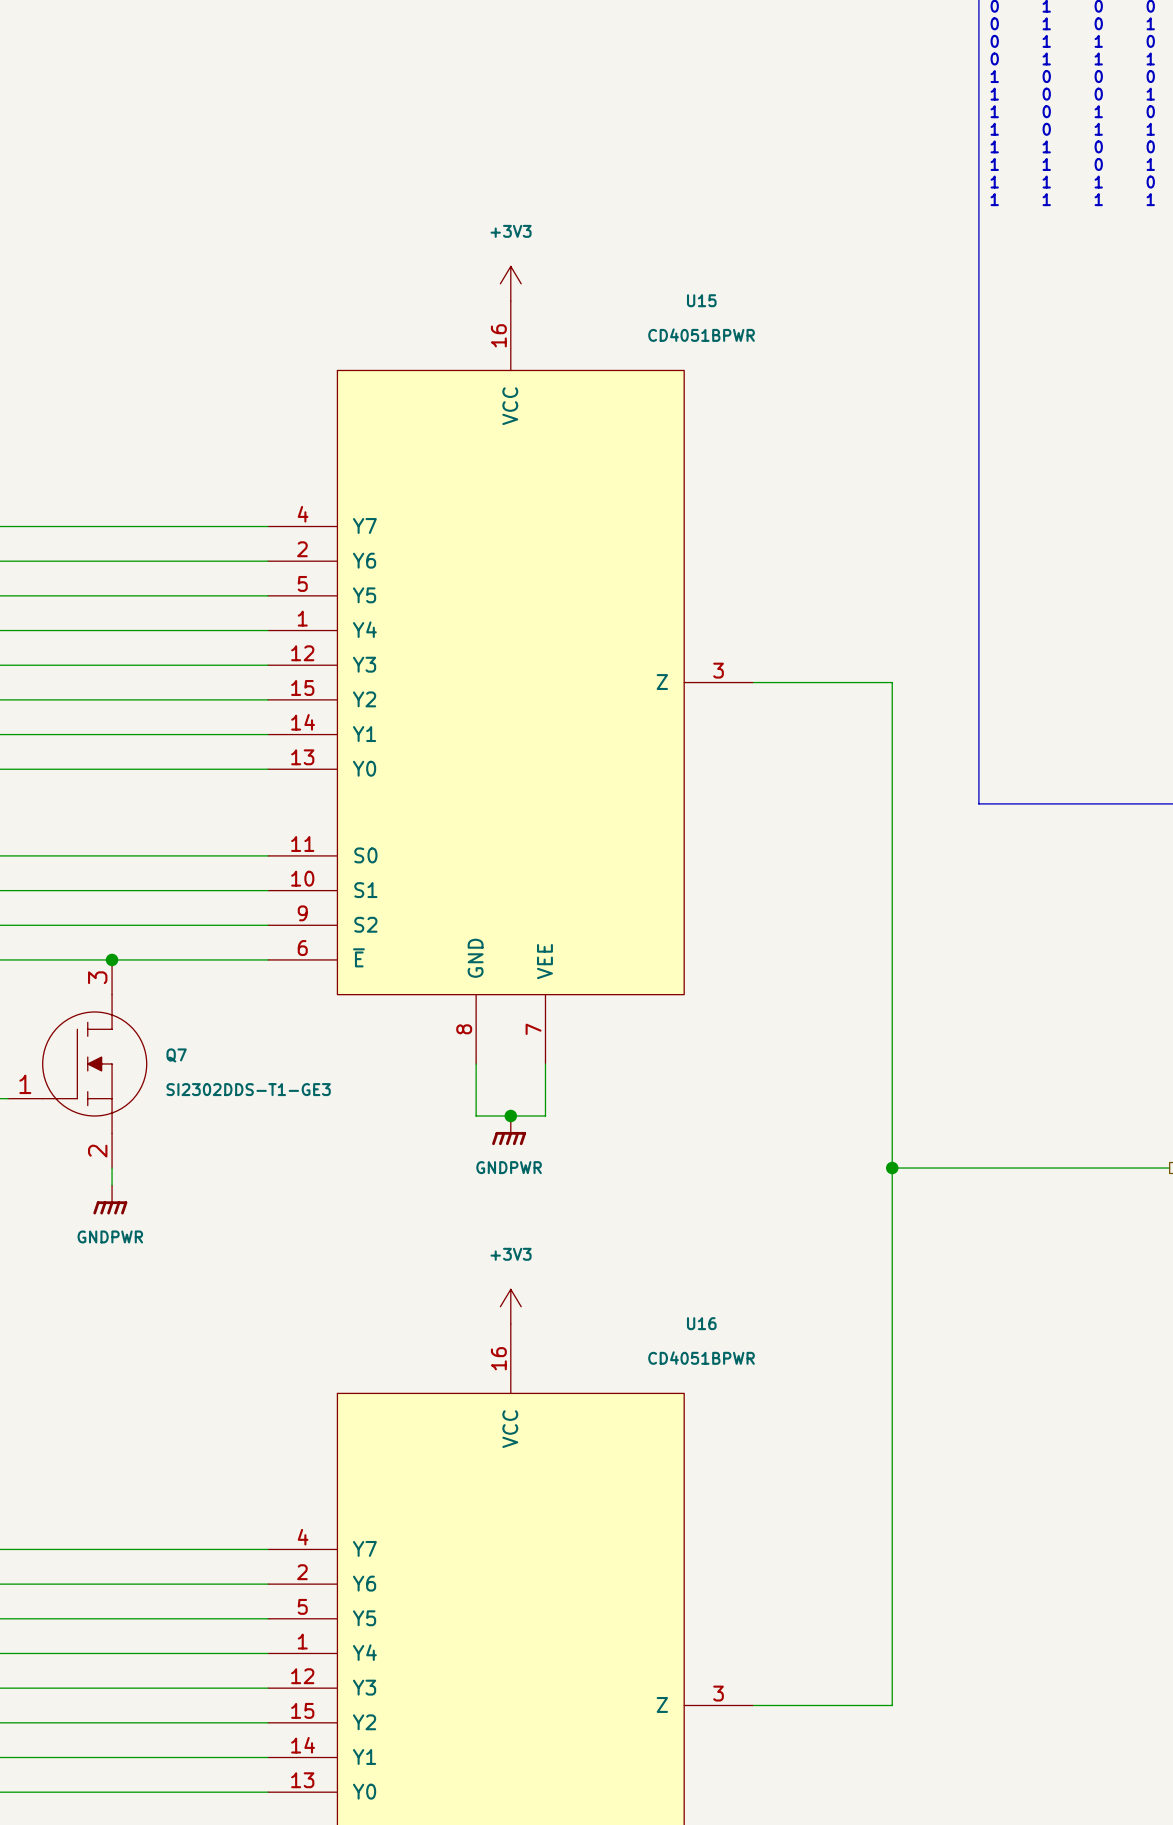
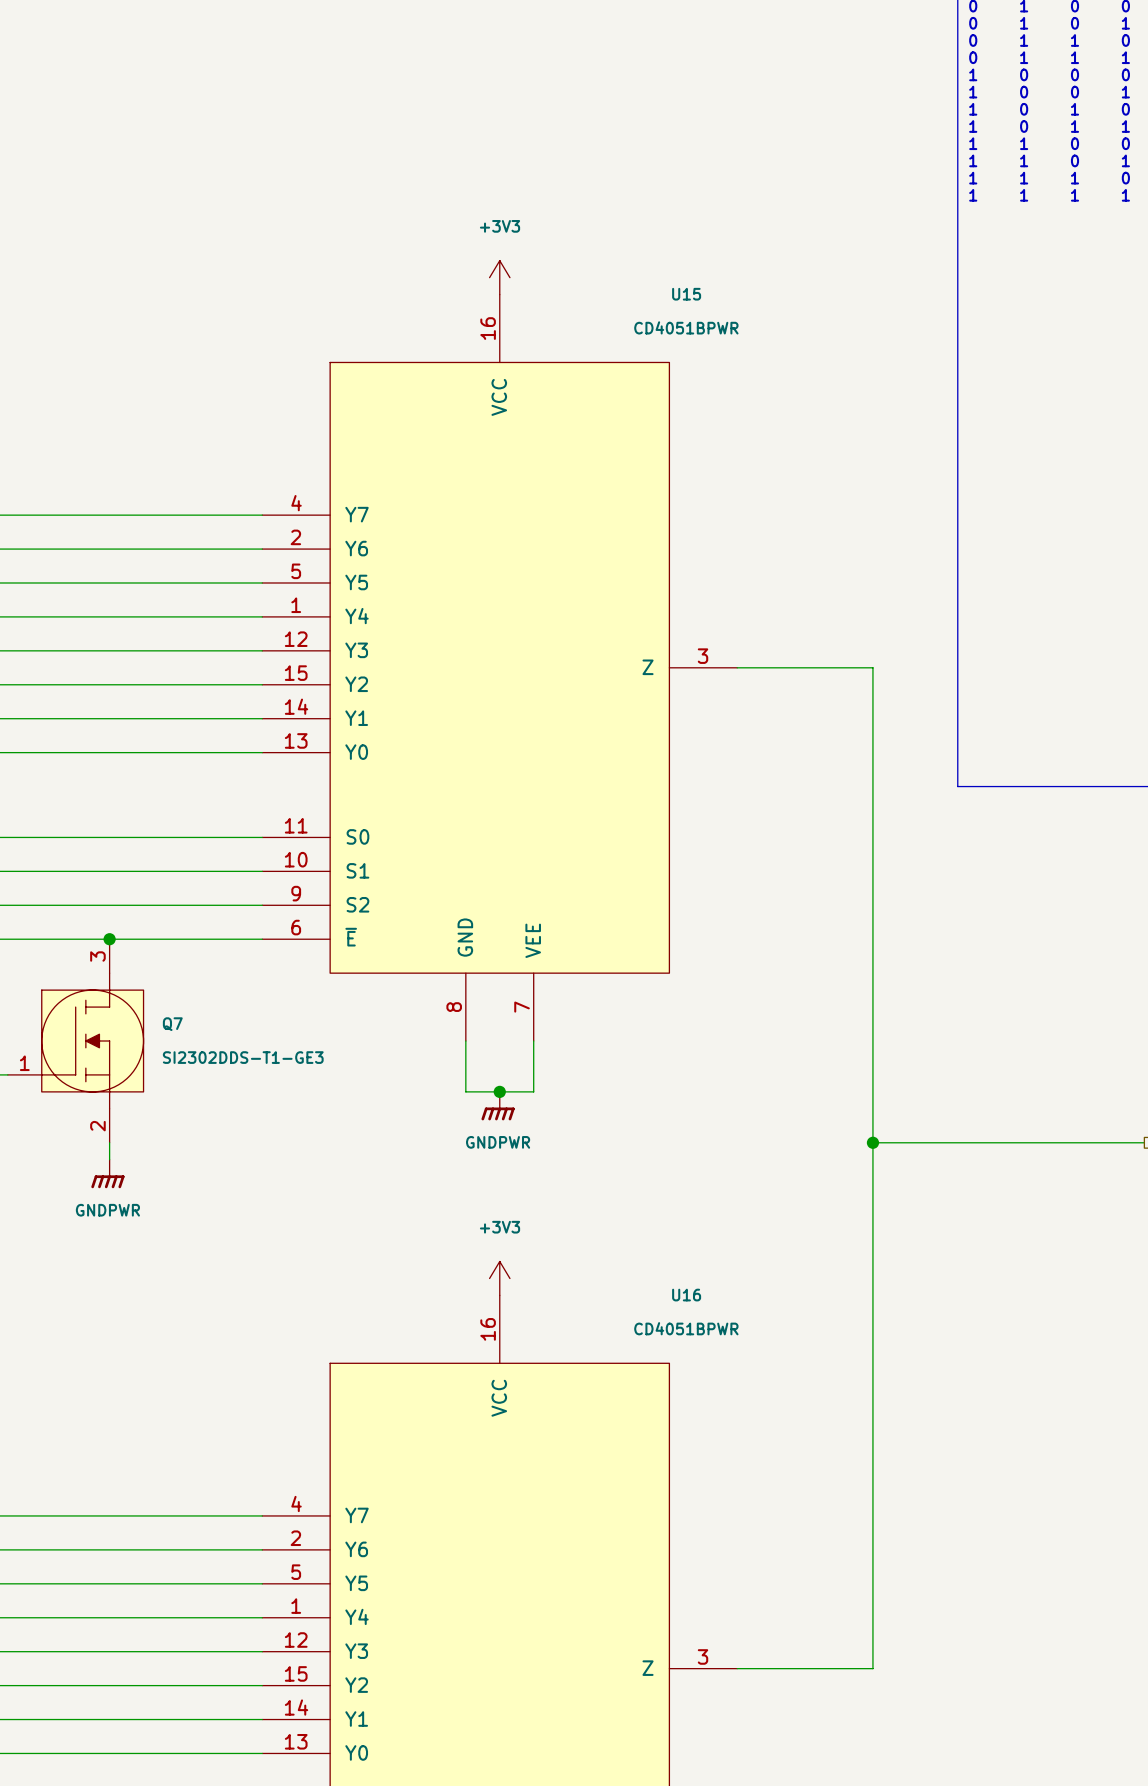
Q7 symbol: [8, 959, 147, 1169] -> [7, 939, 144, 1143]

